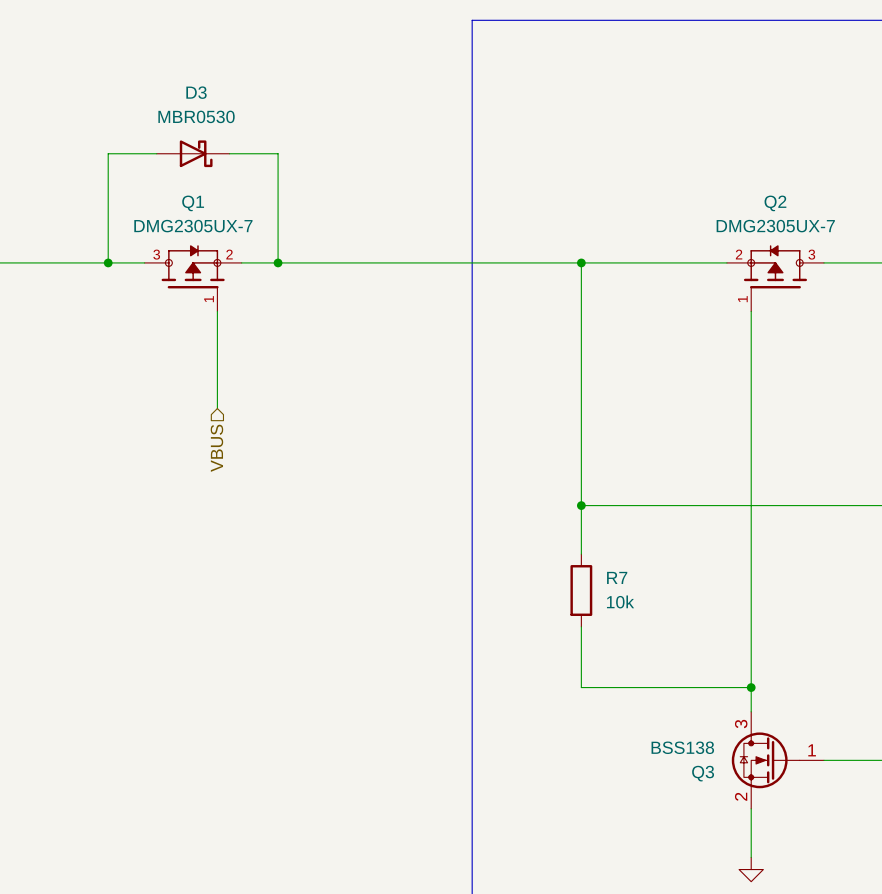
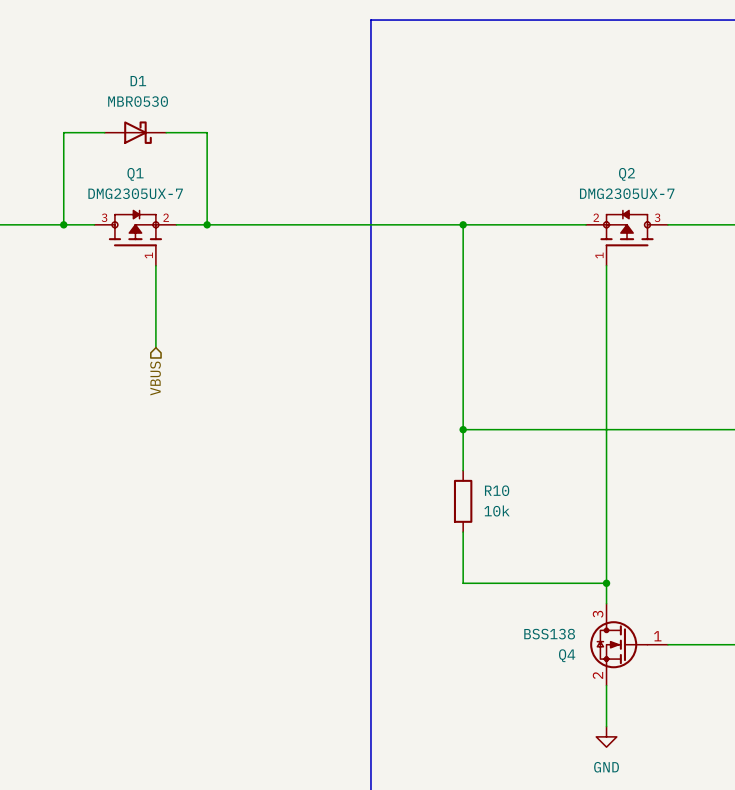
D3 name: D3 (196, 92) -> D1 (138, 81)
R7 name: R7 (617, 577) -> R10 (497, 490)
Q3 name: Q3 (703, 773) -> Q4 (567, 655)

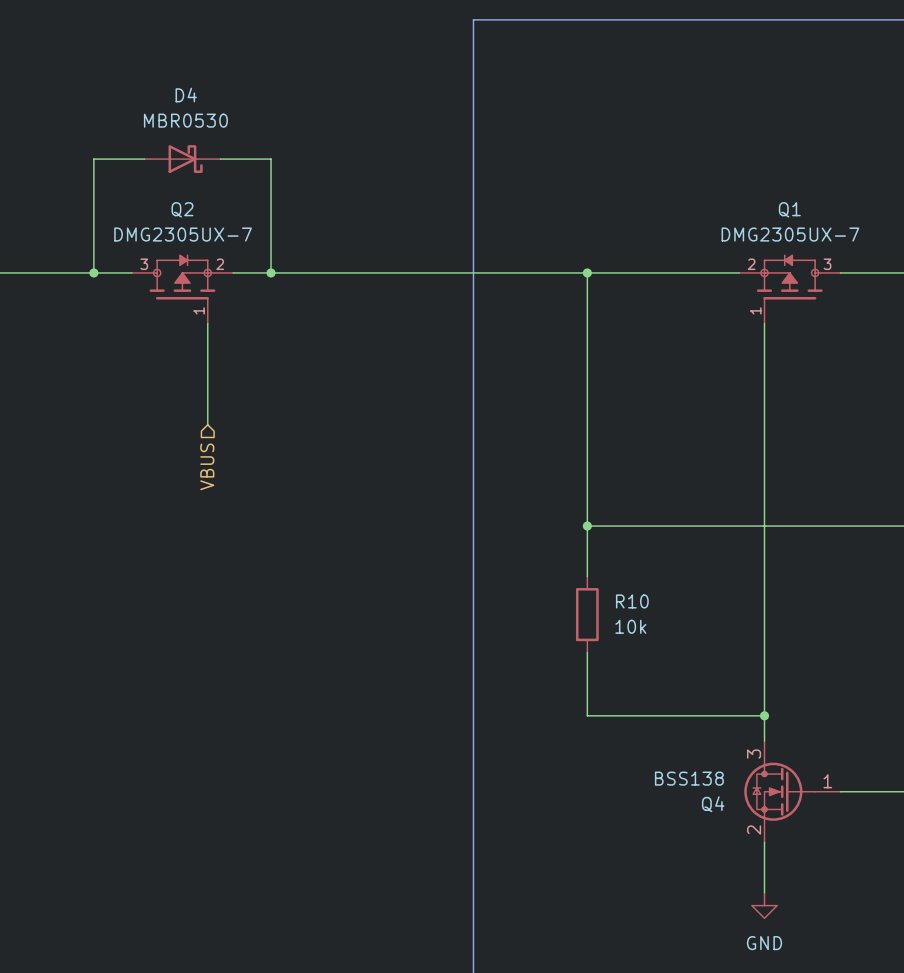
D1 name: D1 (138, 81) -> D4 (186, 95)
Q1 name: Q1 (135, 174) -> Q2 (182, 209)
Q2 name: Q2 (626, 174) -> Q1 (789, 209)

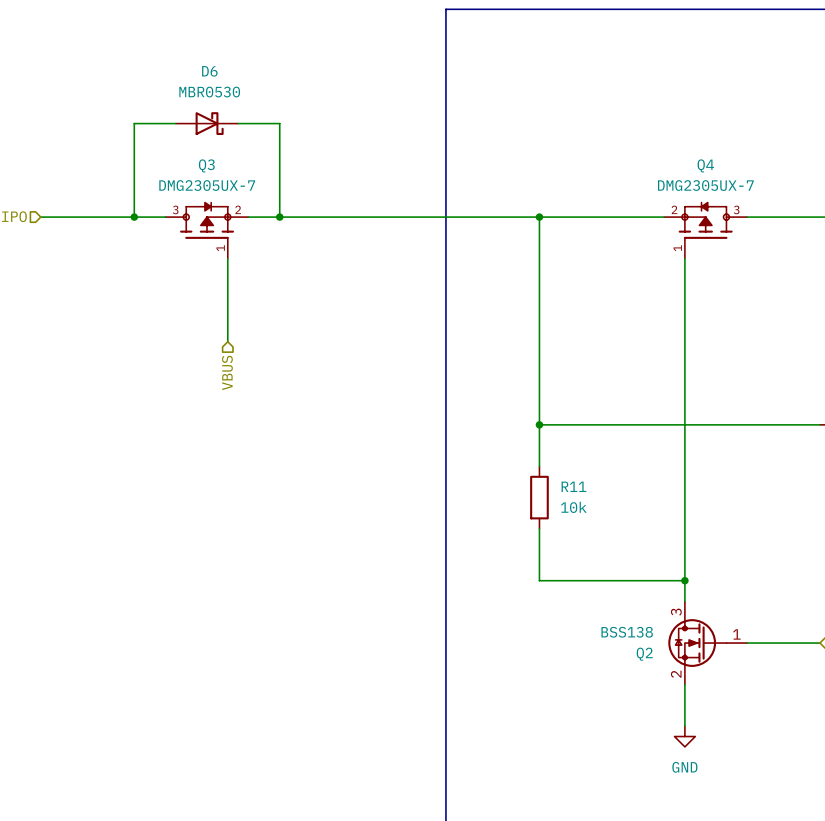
D4 name: D4 (186, 95) -> D6 (209, 71)
Q2 name: Q2 (182, 209) -> Q3 (206, 165)
Q1 name: Q1 (789, 209) -> Q4 (705, 165)
R10 name: R10 (632, 601) -> R11 (573, 486)
Q4 name: Q4 (713, 804) -> Q2 (644, 654)

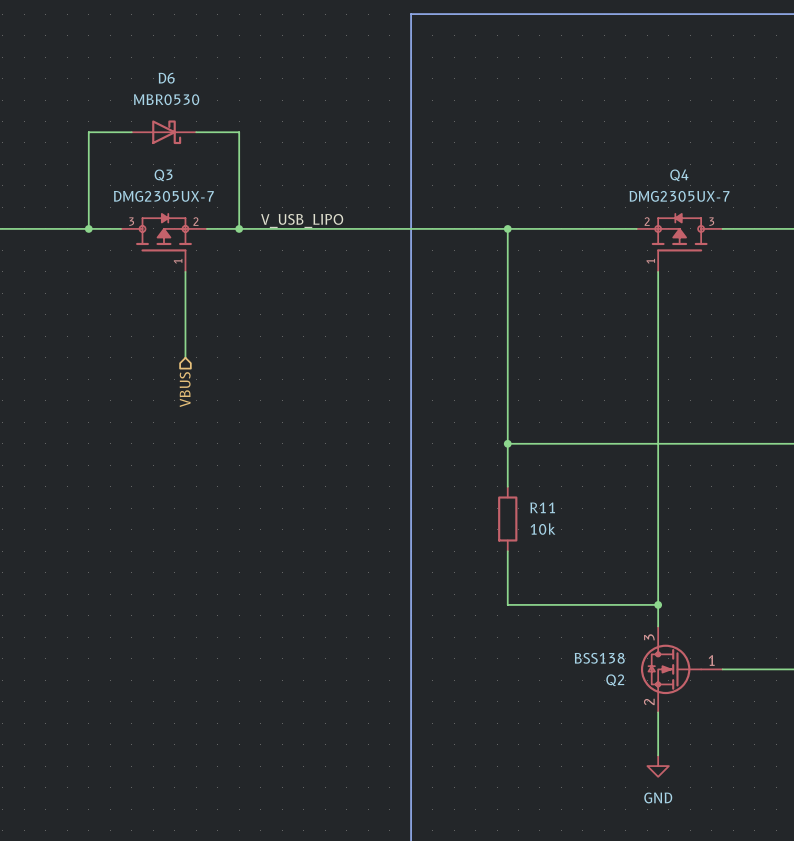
label: none -> V_USB_LIPO (302, 220)

